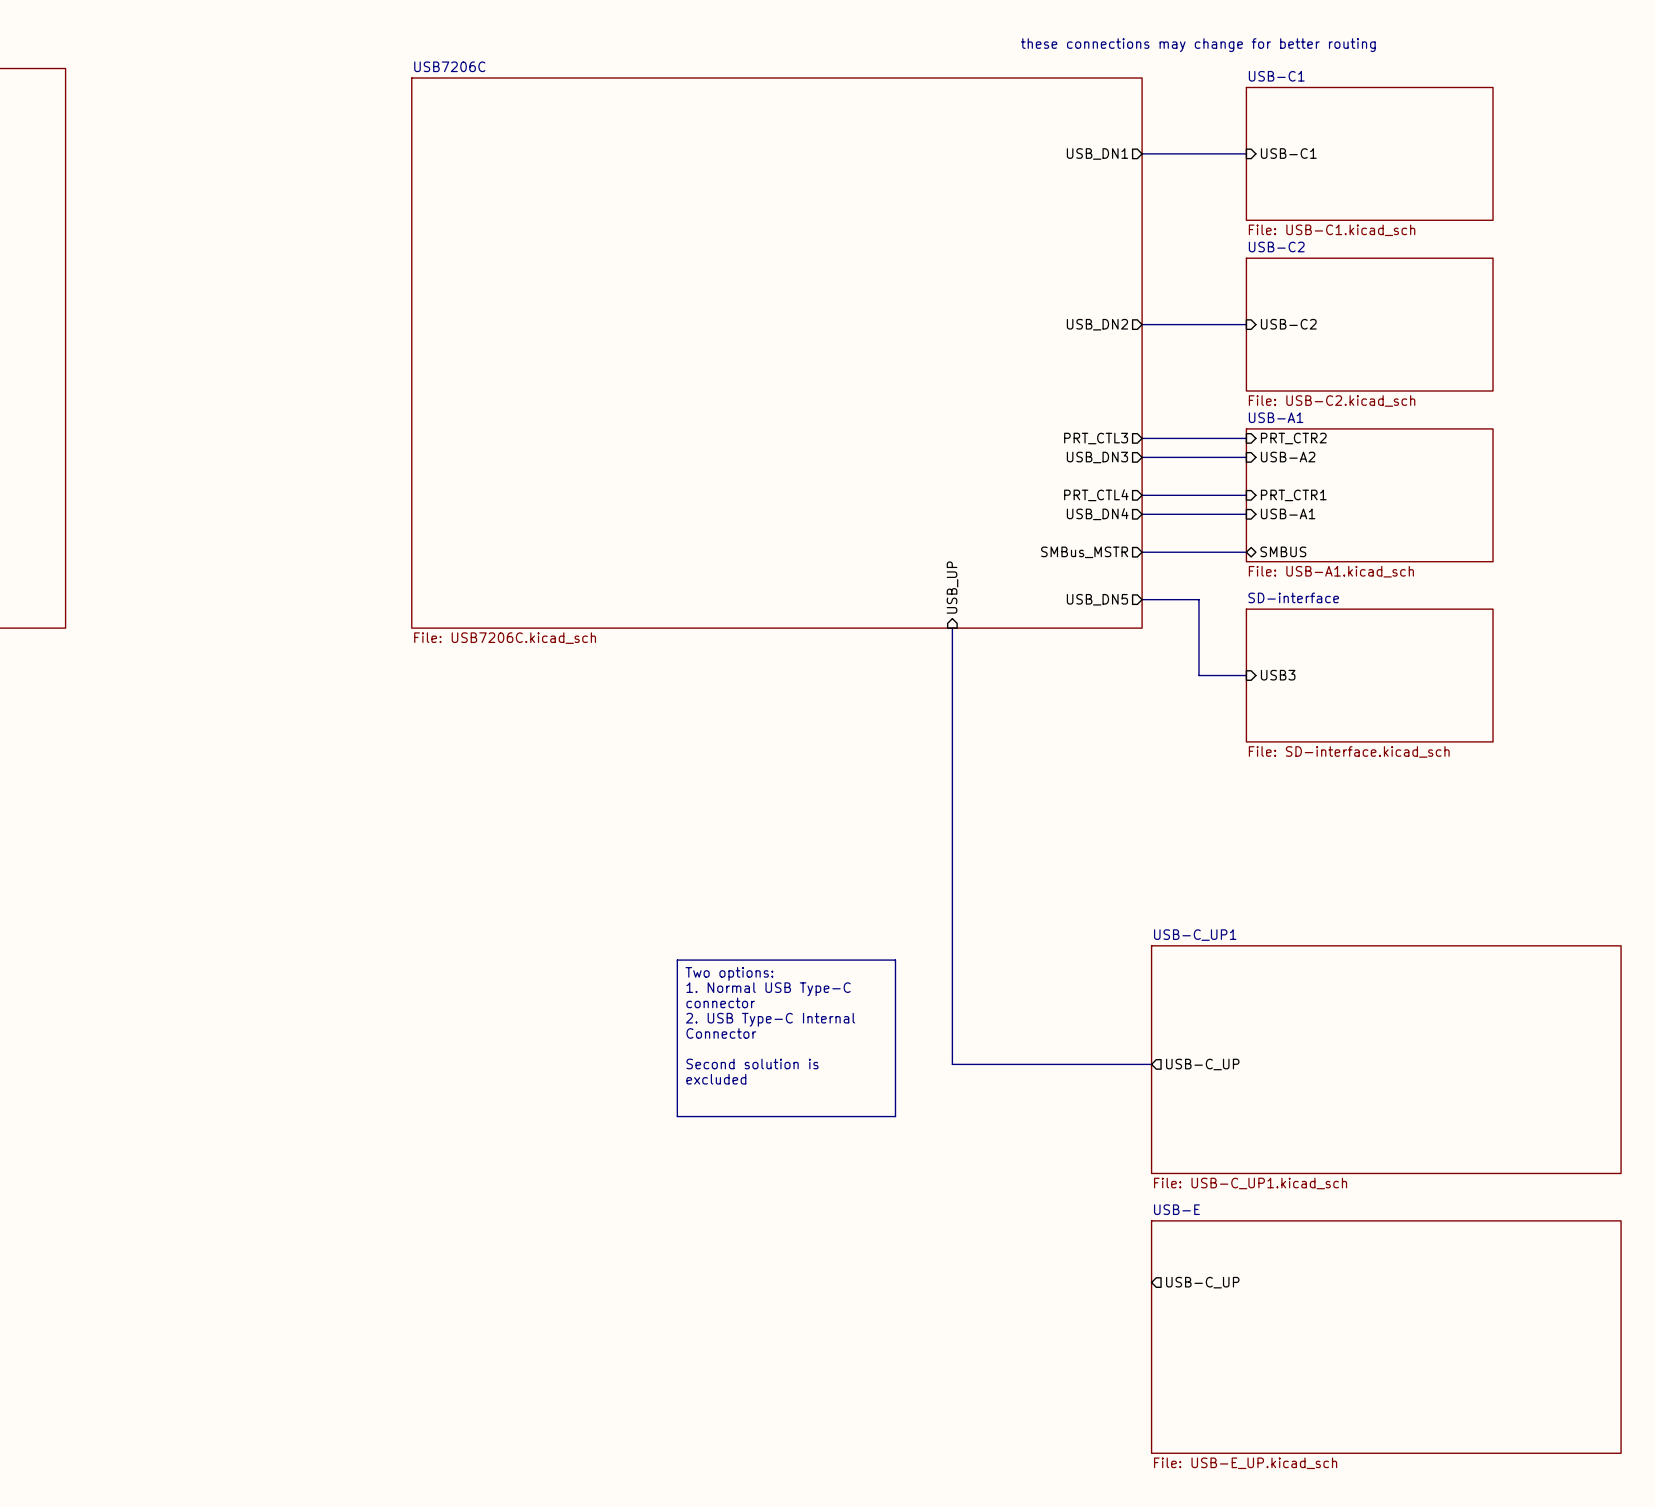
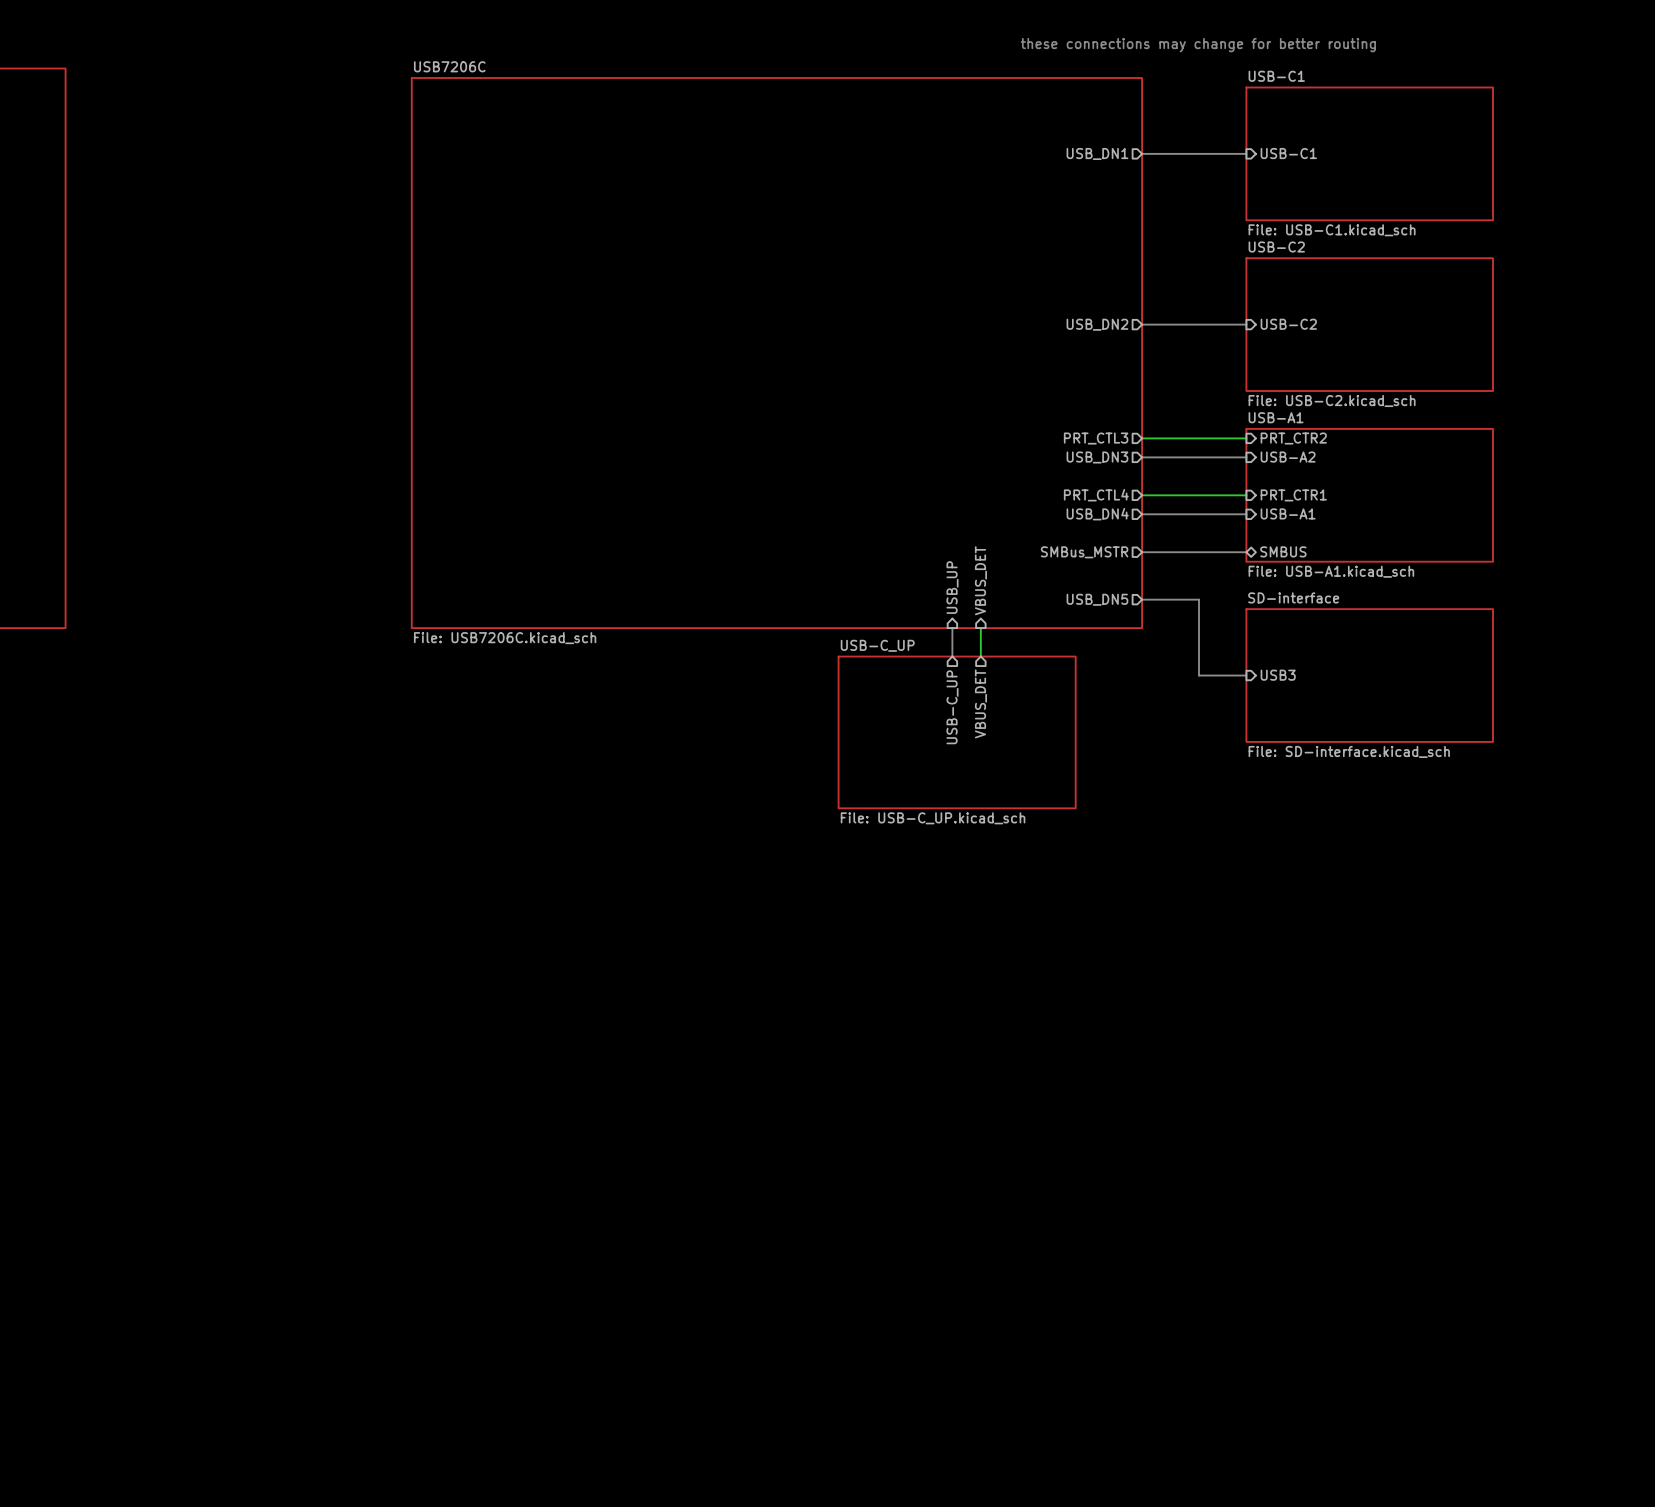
sheet pin: none -> VBUS_DET (980, 580)
wire: none -> (980, 628) (980, 656)
bus: (952, 656) (952, 1064) (1151, 1064) -> none
sheet pin: none -> VBUS_DET (980, 703)
sheet pin: none -> USB-C_UP (952, 707)
sheet USB-C_UP: none -> File: USB-C_UP.kicad_sch (957, 732)
line: (677, 960) (895, 960) (895, 1116) (677, 1116) (677, 960) -> none
text: Two options: (729, 973) -> none
text: 1. Normal USB Type-C (768, 989) -> none
text: connector (720, 1002) -> none
text: 2. USB Type-C Internal (770, 1019) -> none
text: Connector (721, 1033) -> none
sheet USB-C_UP1: File: USB-C_UP1.kicad_sch (1386, 1059) -> none
text: Second solution is (752, 1063) -> none
sheet pin: USB-C_UP (1202, 1064) -> none
text: excluded (716, 1079) -> none
sheet pin: USB-C_UP (1202, 1282) -> none
sheet USB-E: File: USB-E_UP.kicad_sch (1386, 1337) -> none

